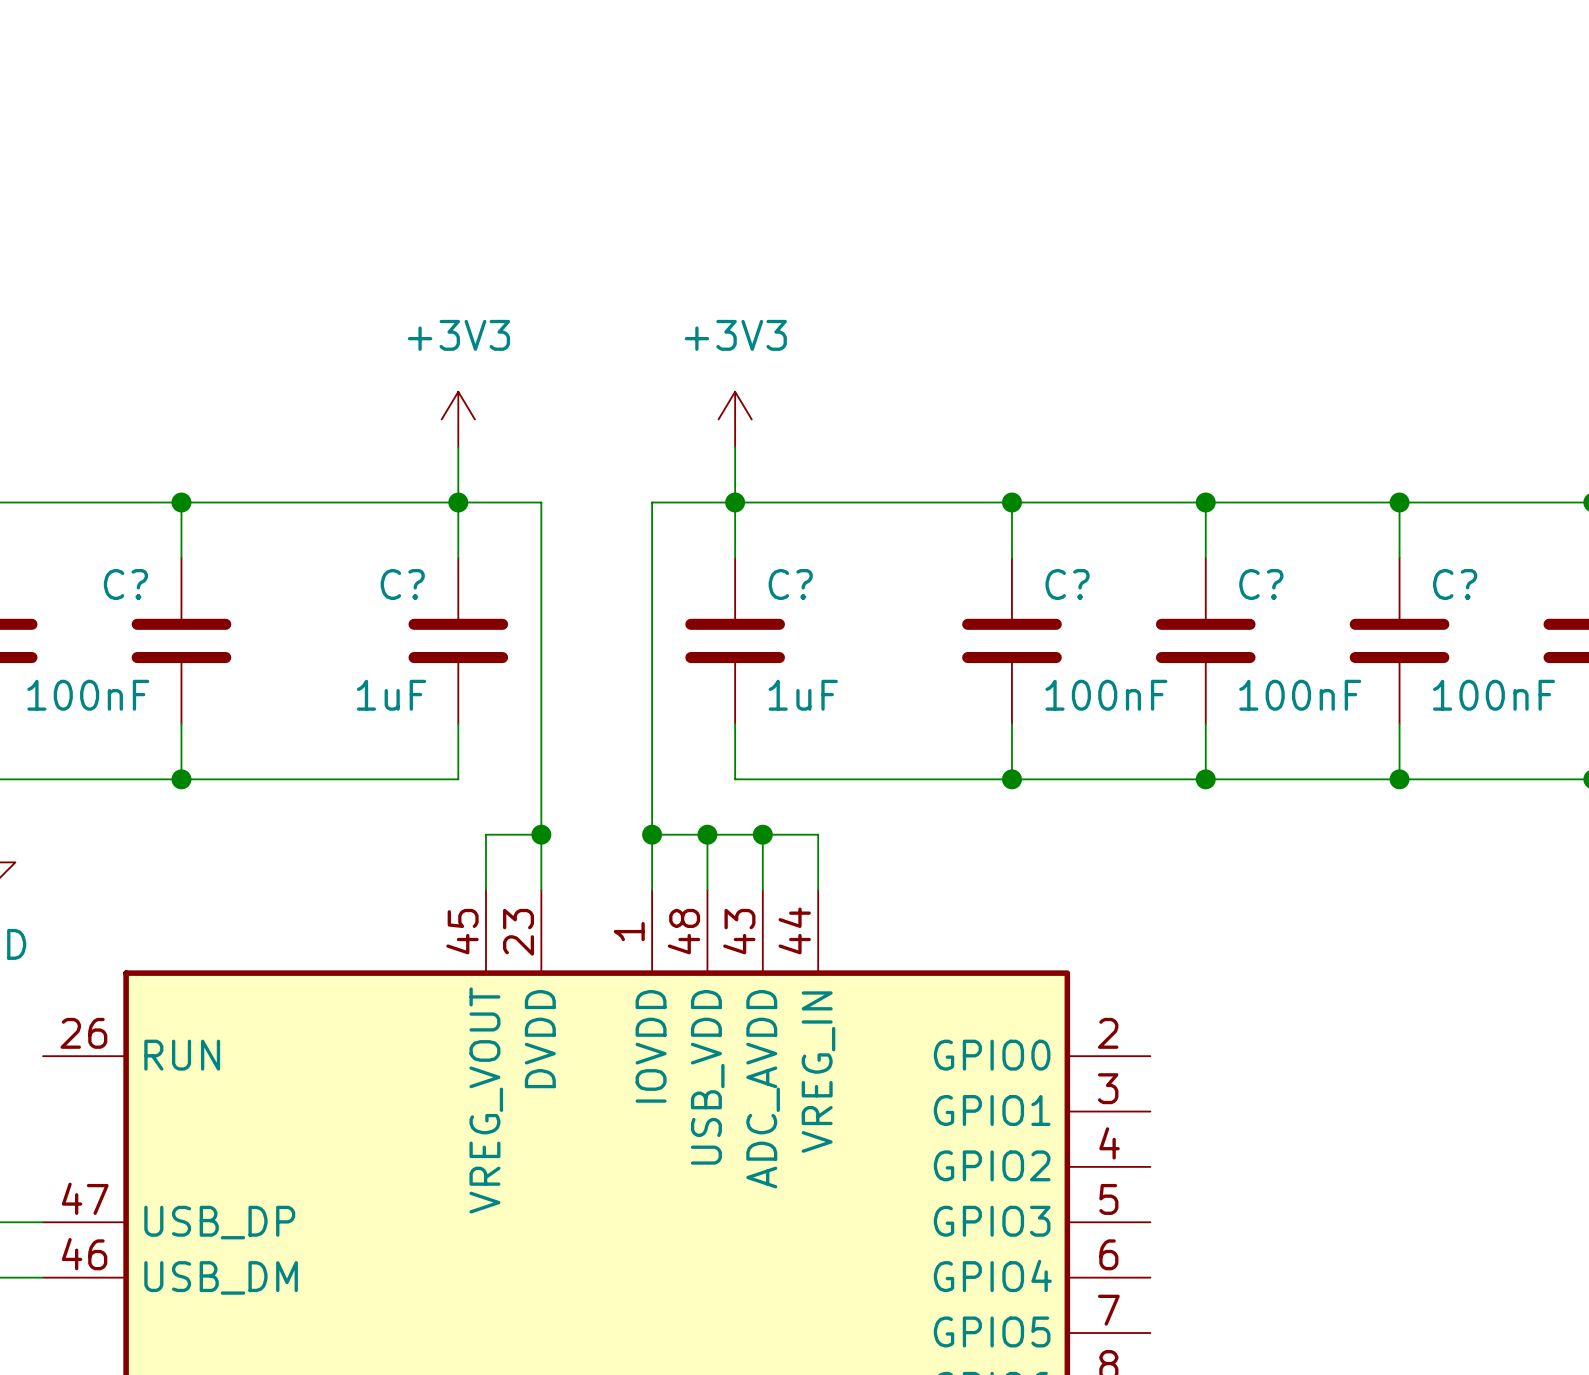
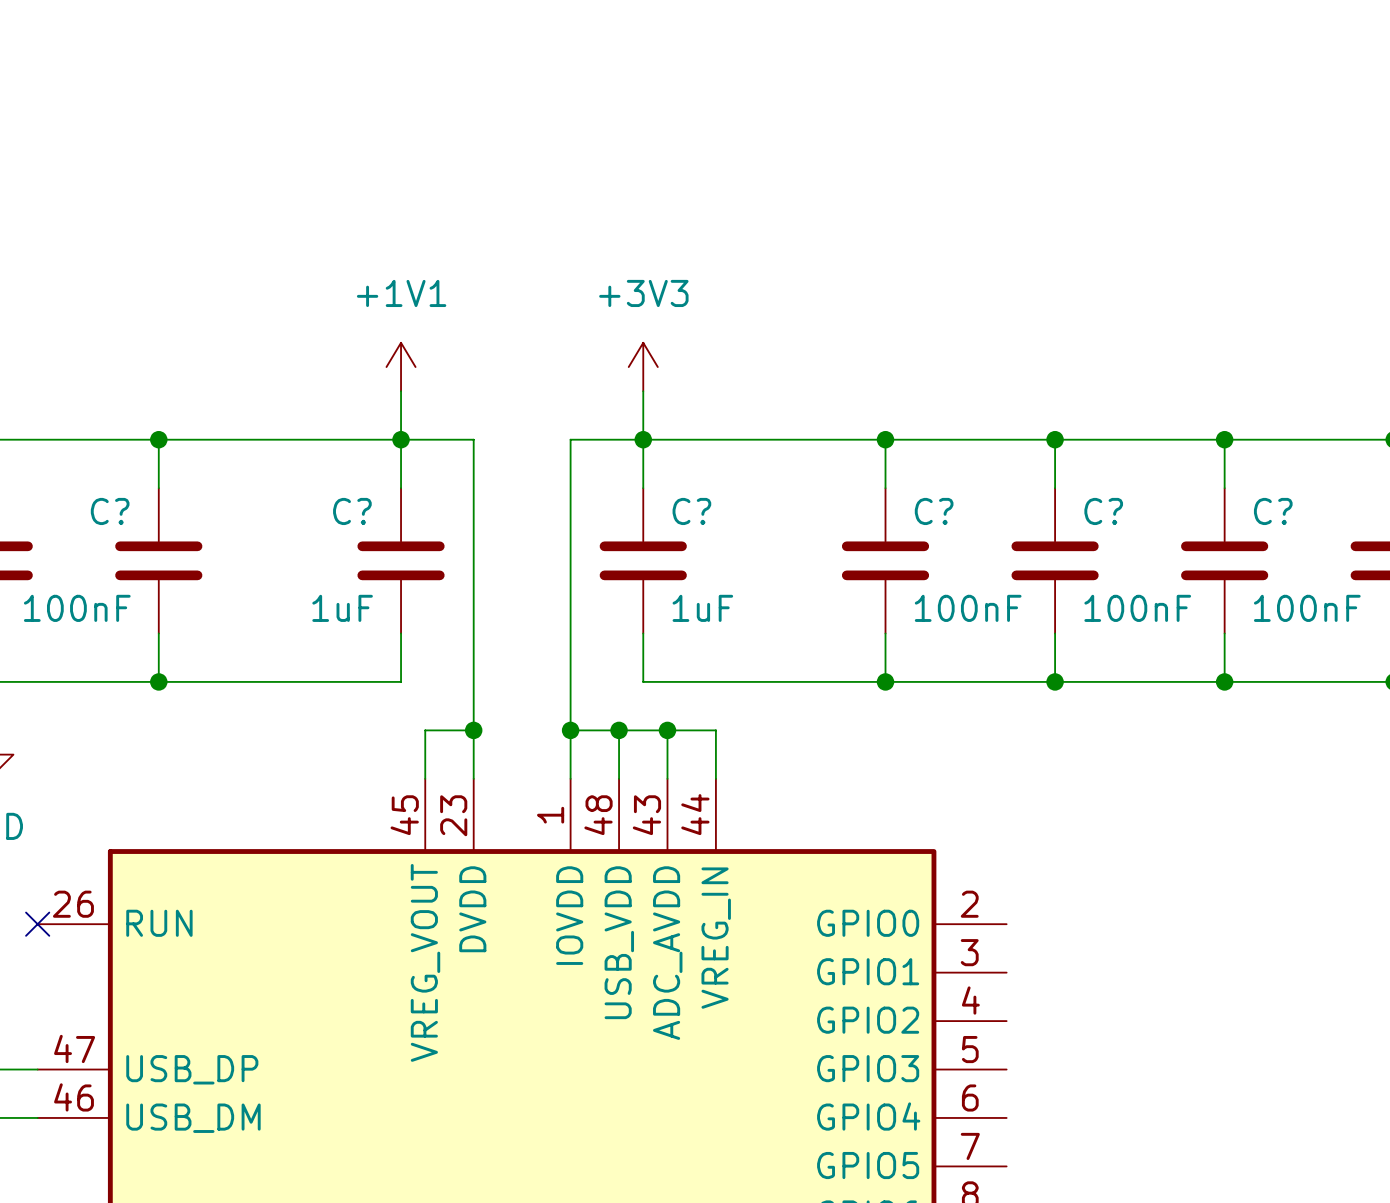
power symbol: +3V3 (458, 419) -> +1V1 (401, 367)
no-connect mark: none -> (37, 924)

